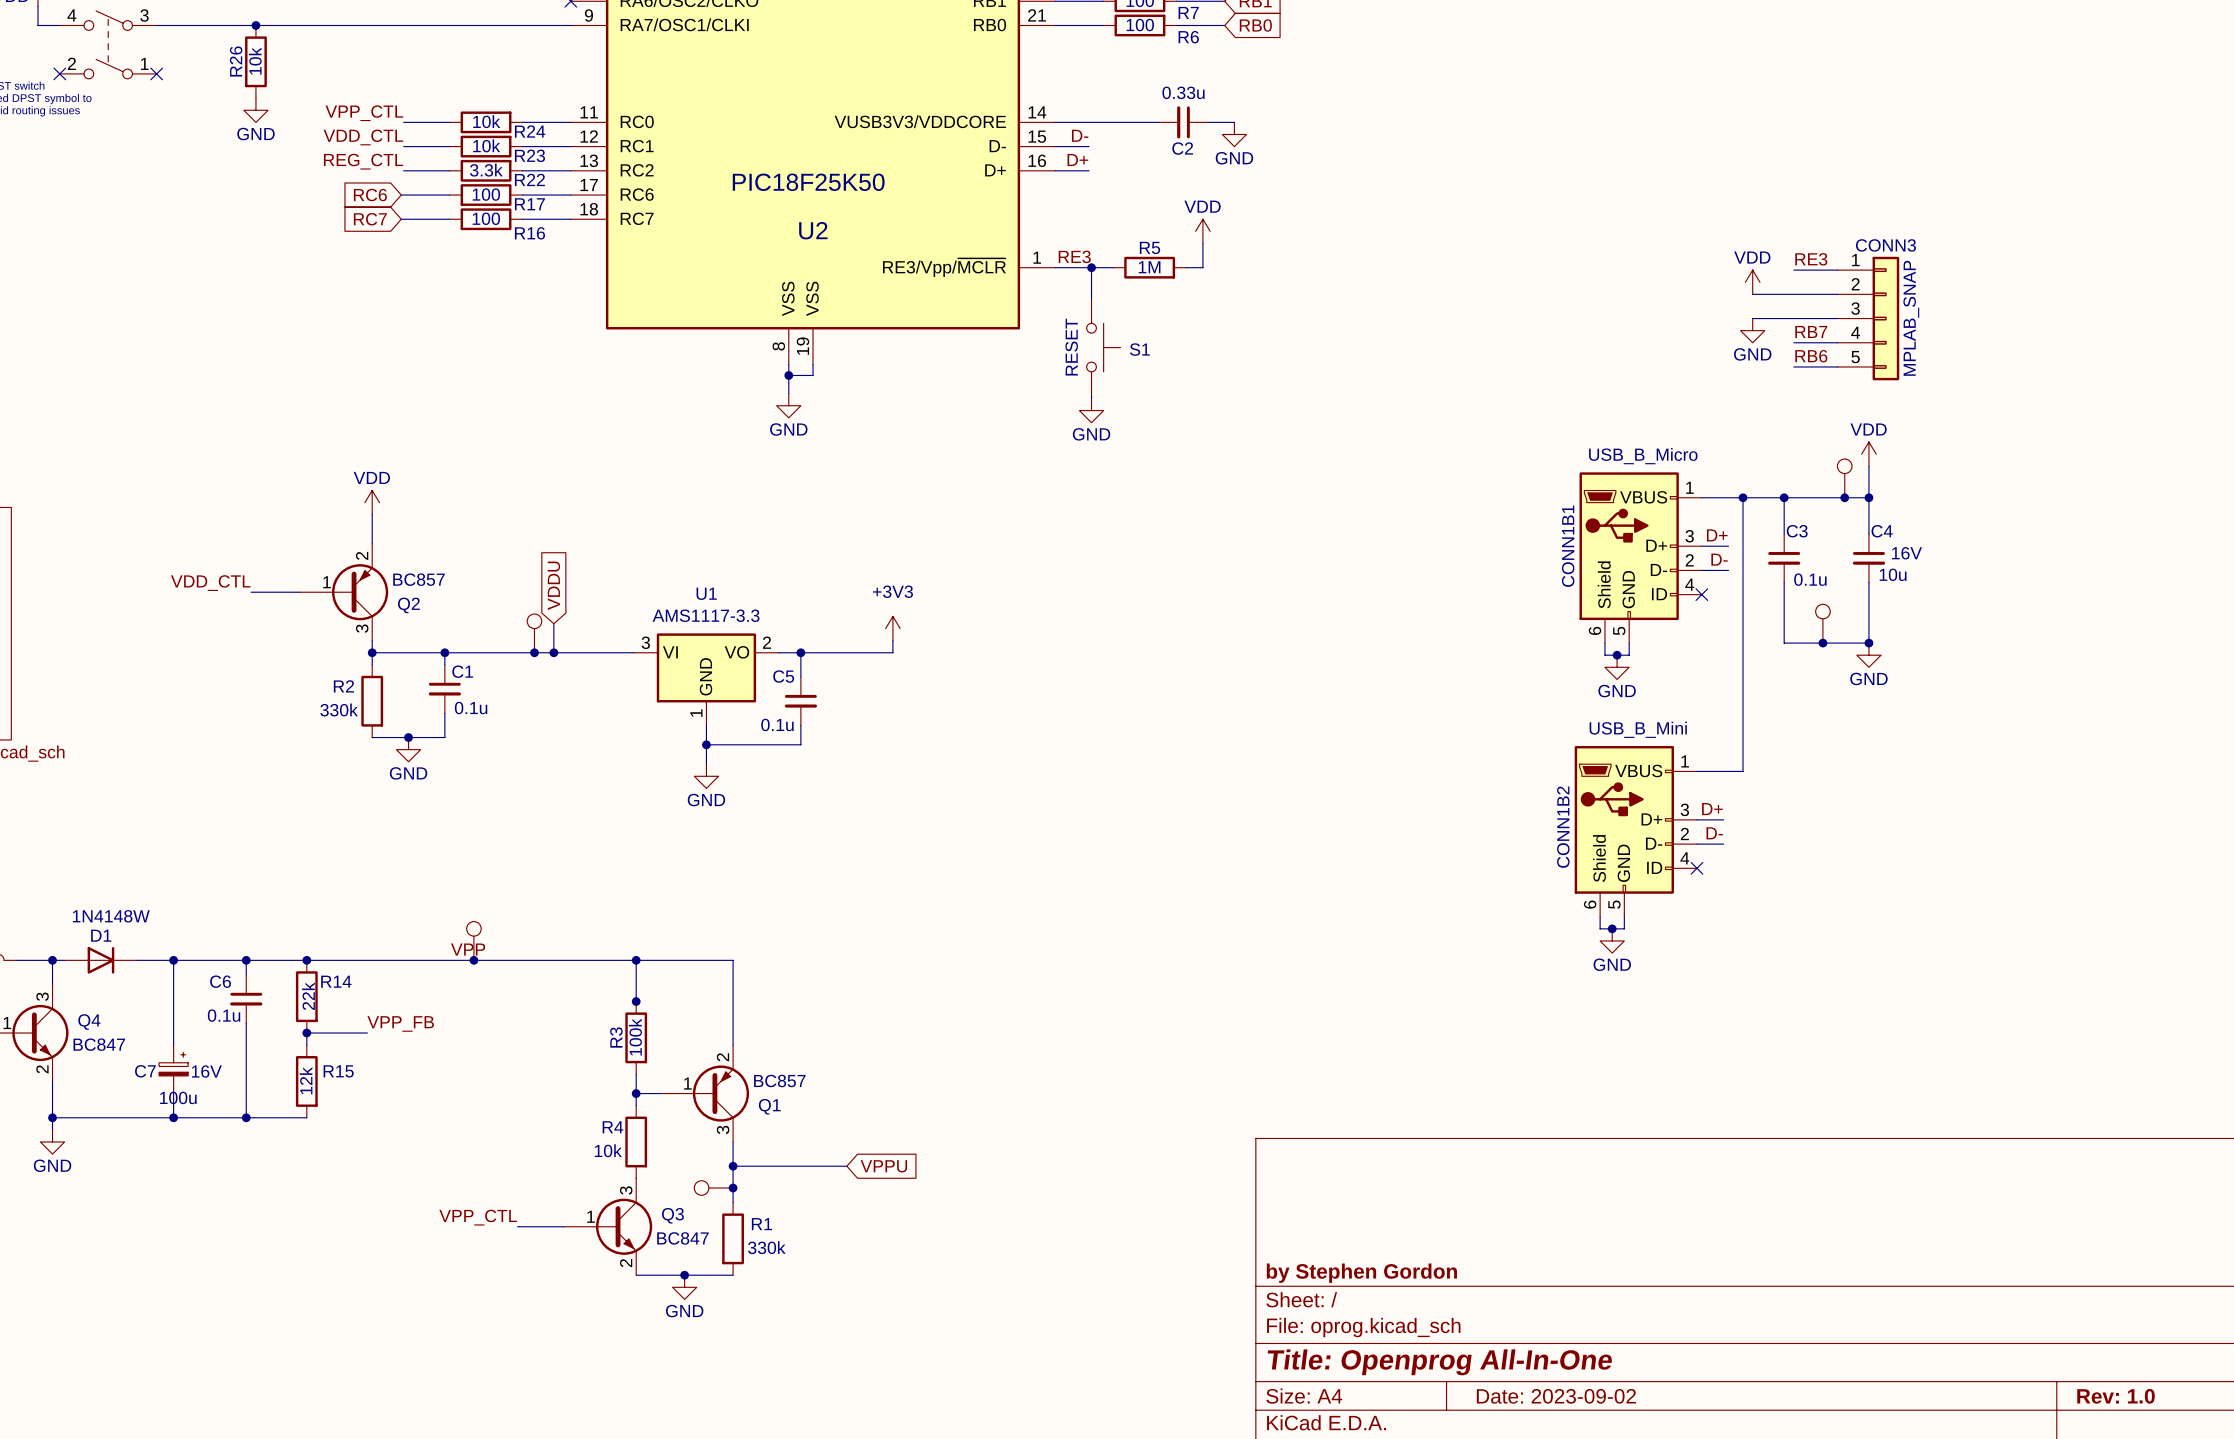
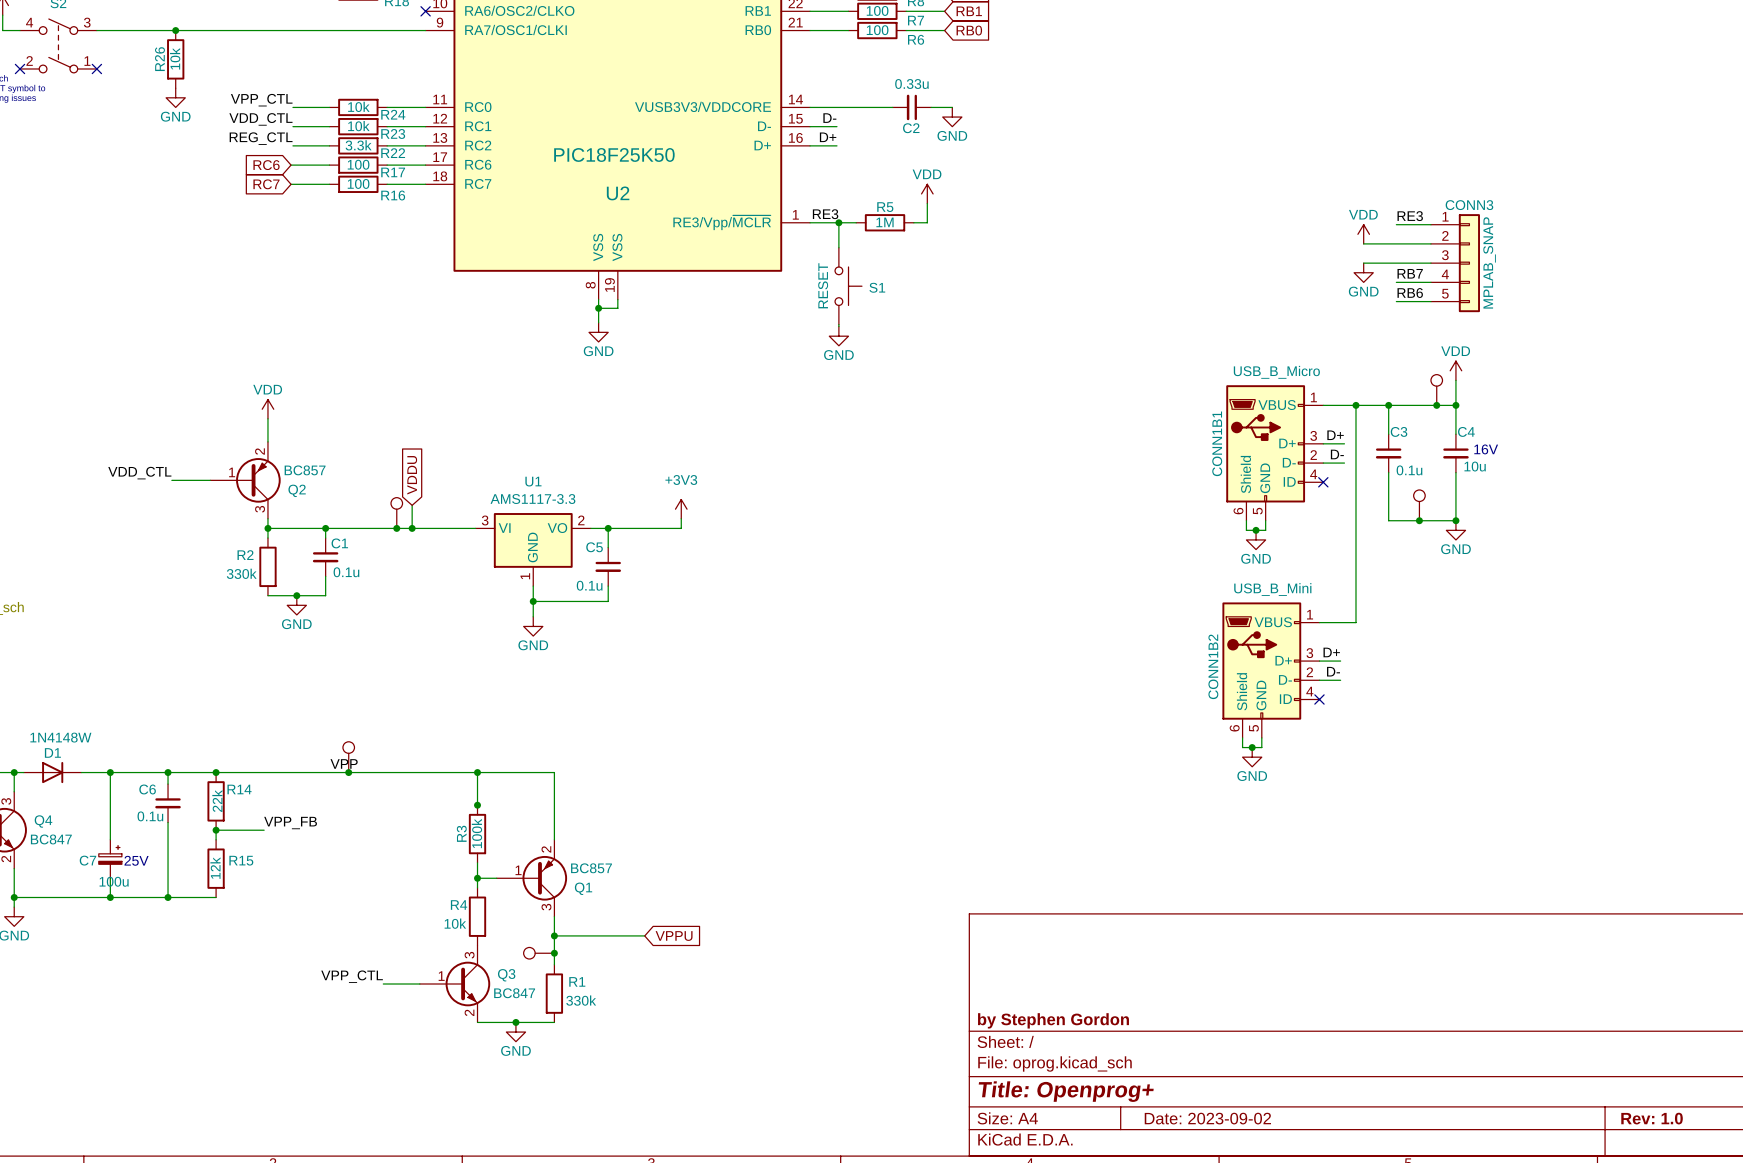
text: 16V (206, 1071) -> 25V (136, 860)
title block: Title: Openprog All-In-One (1439, 1362) -> Title: Openprog+ (1066, 1091)

